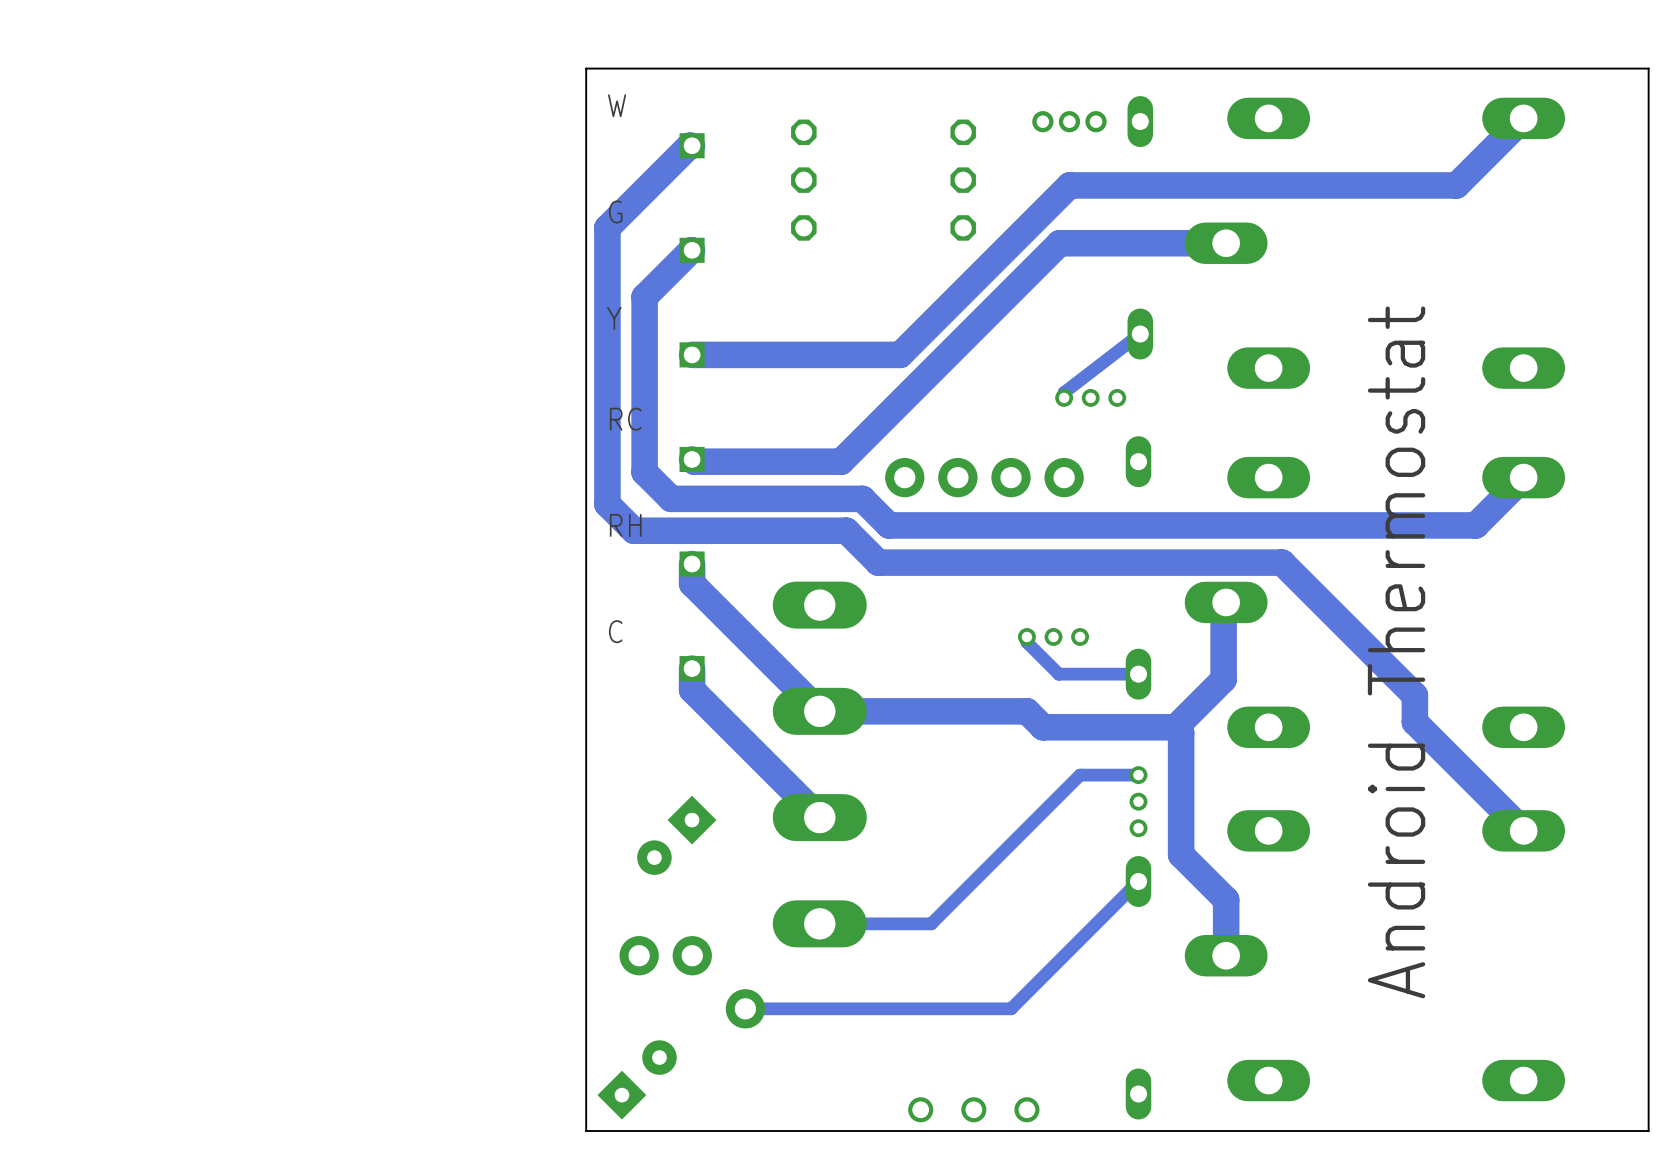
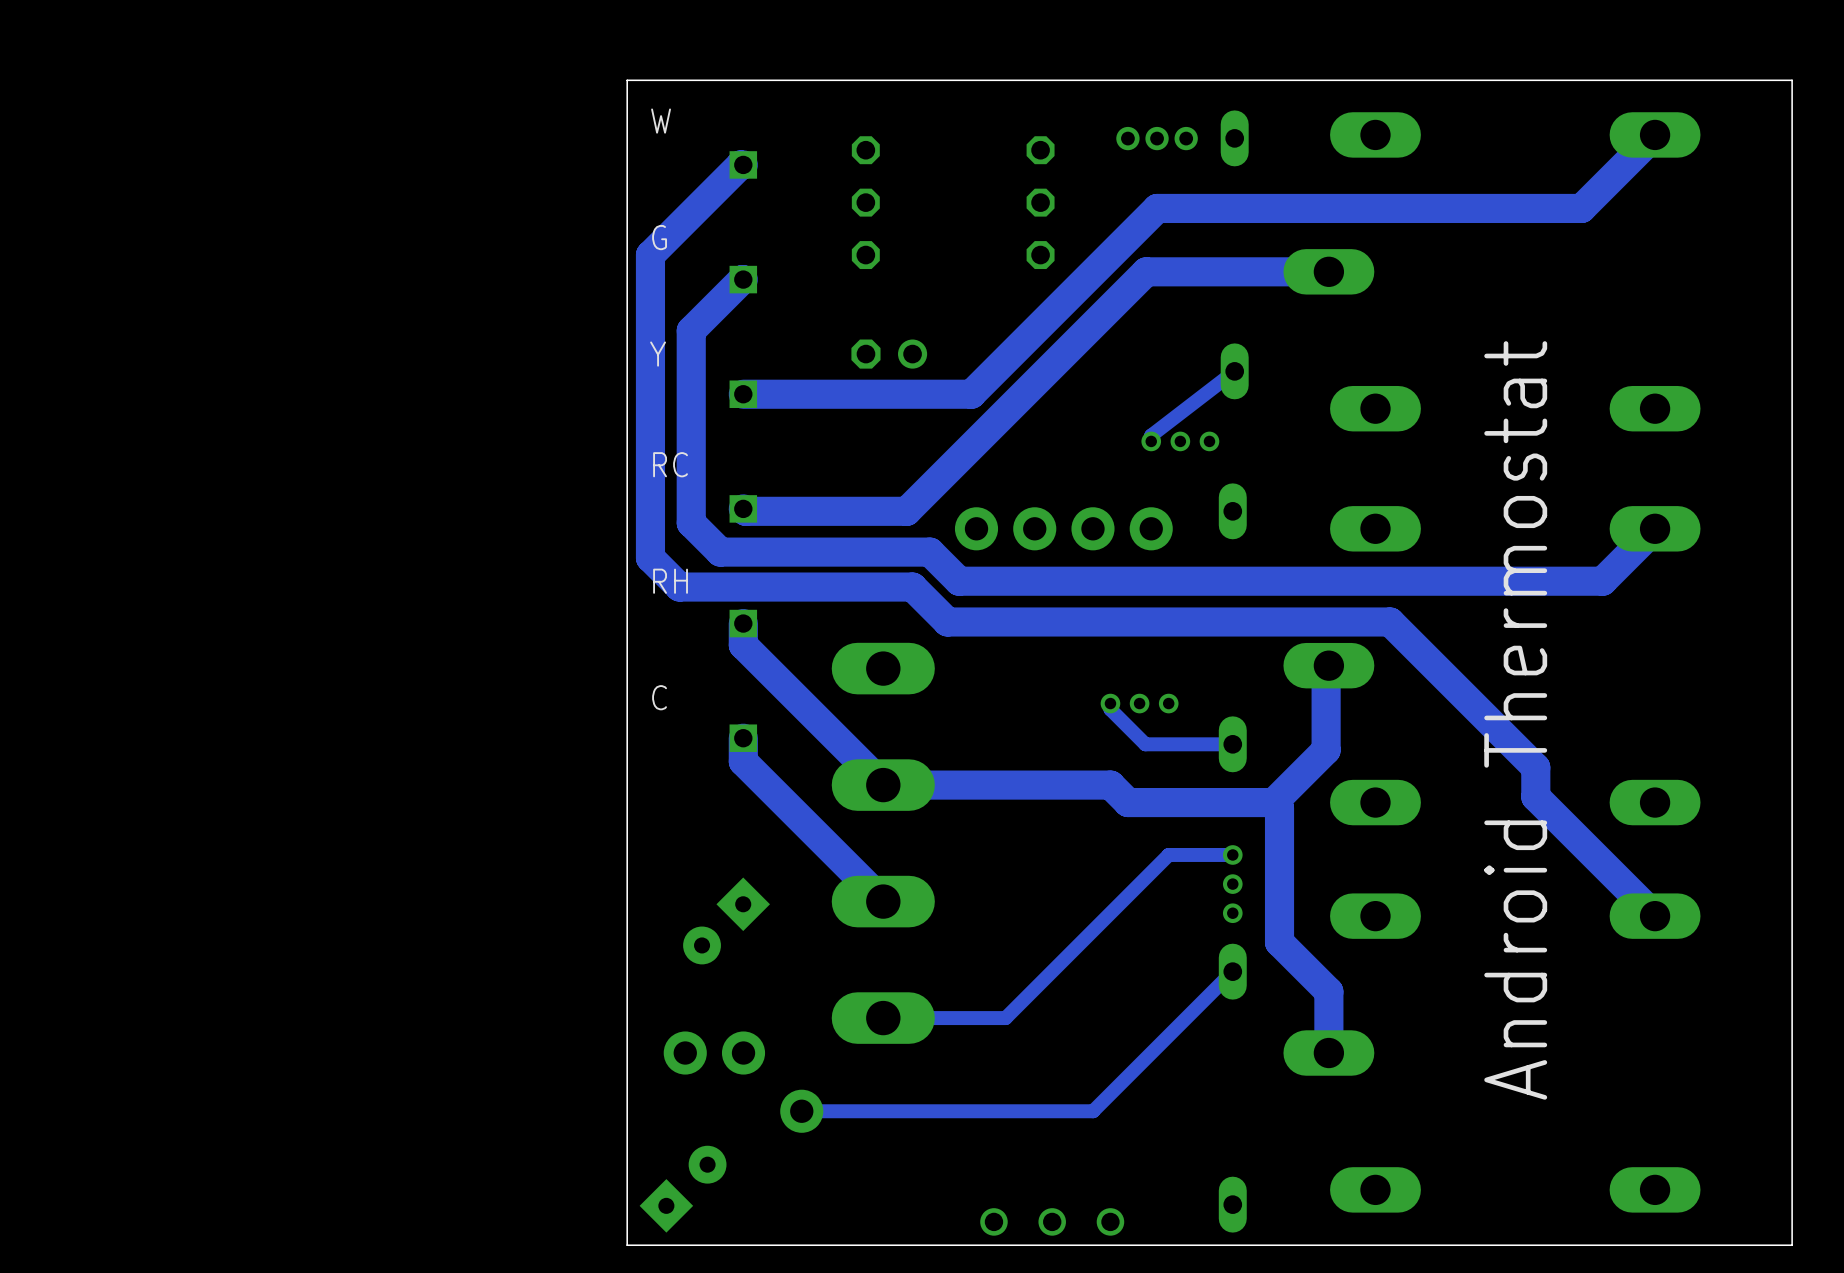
part: none -> (889, 354)

